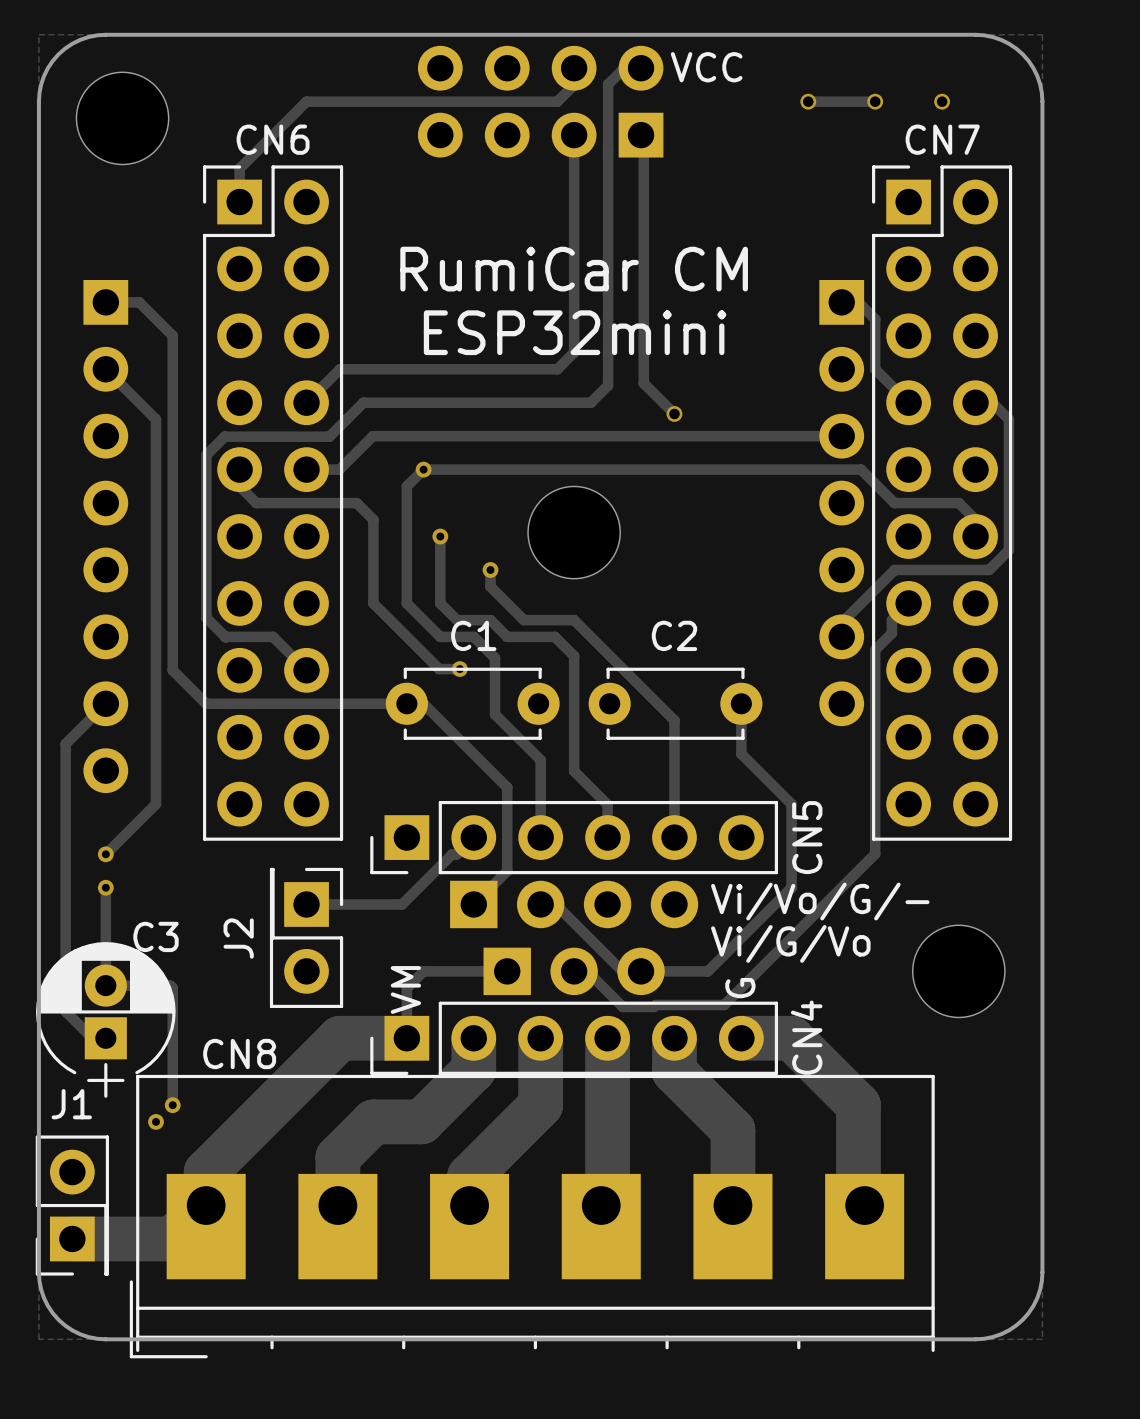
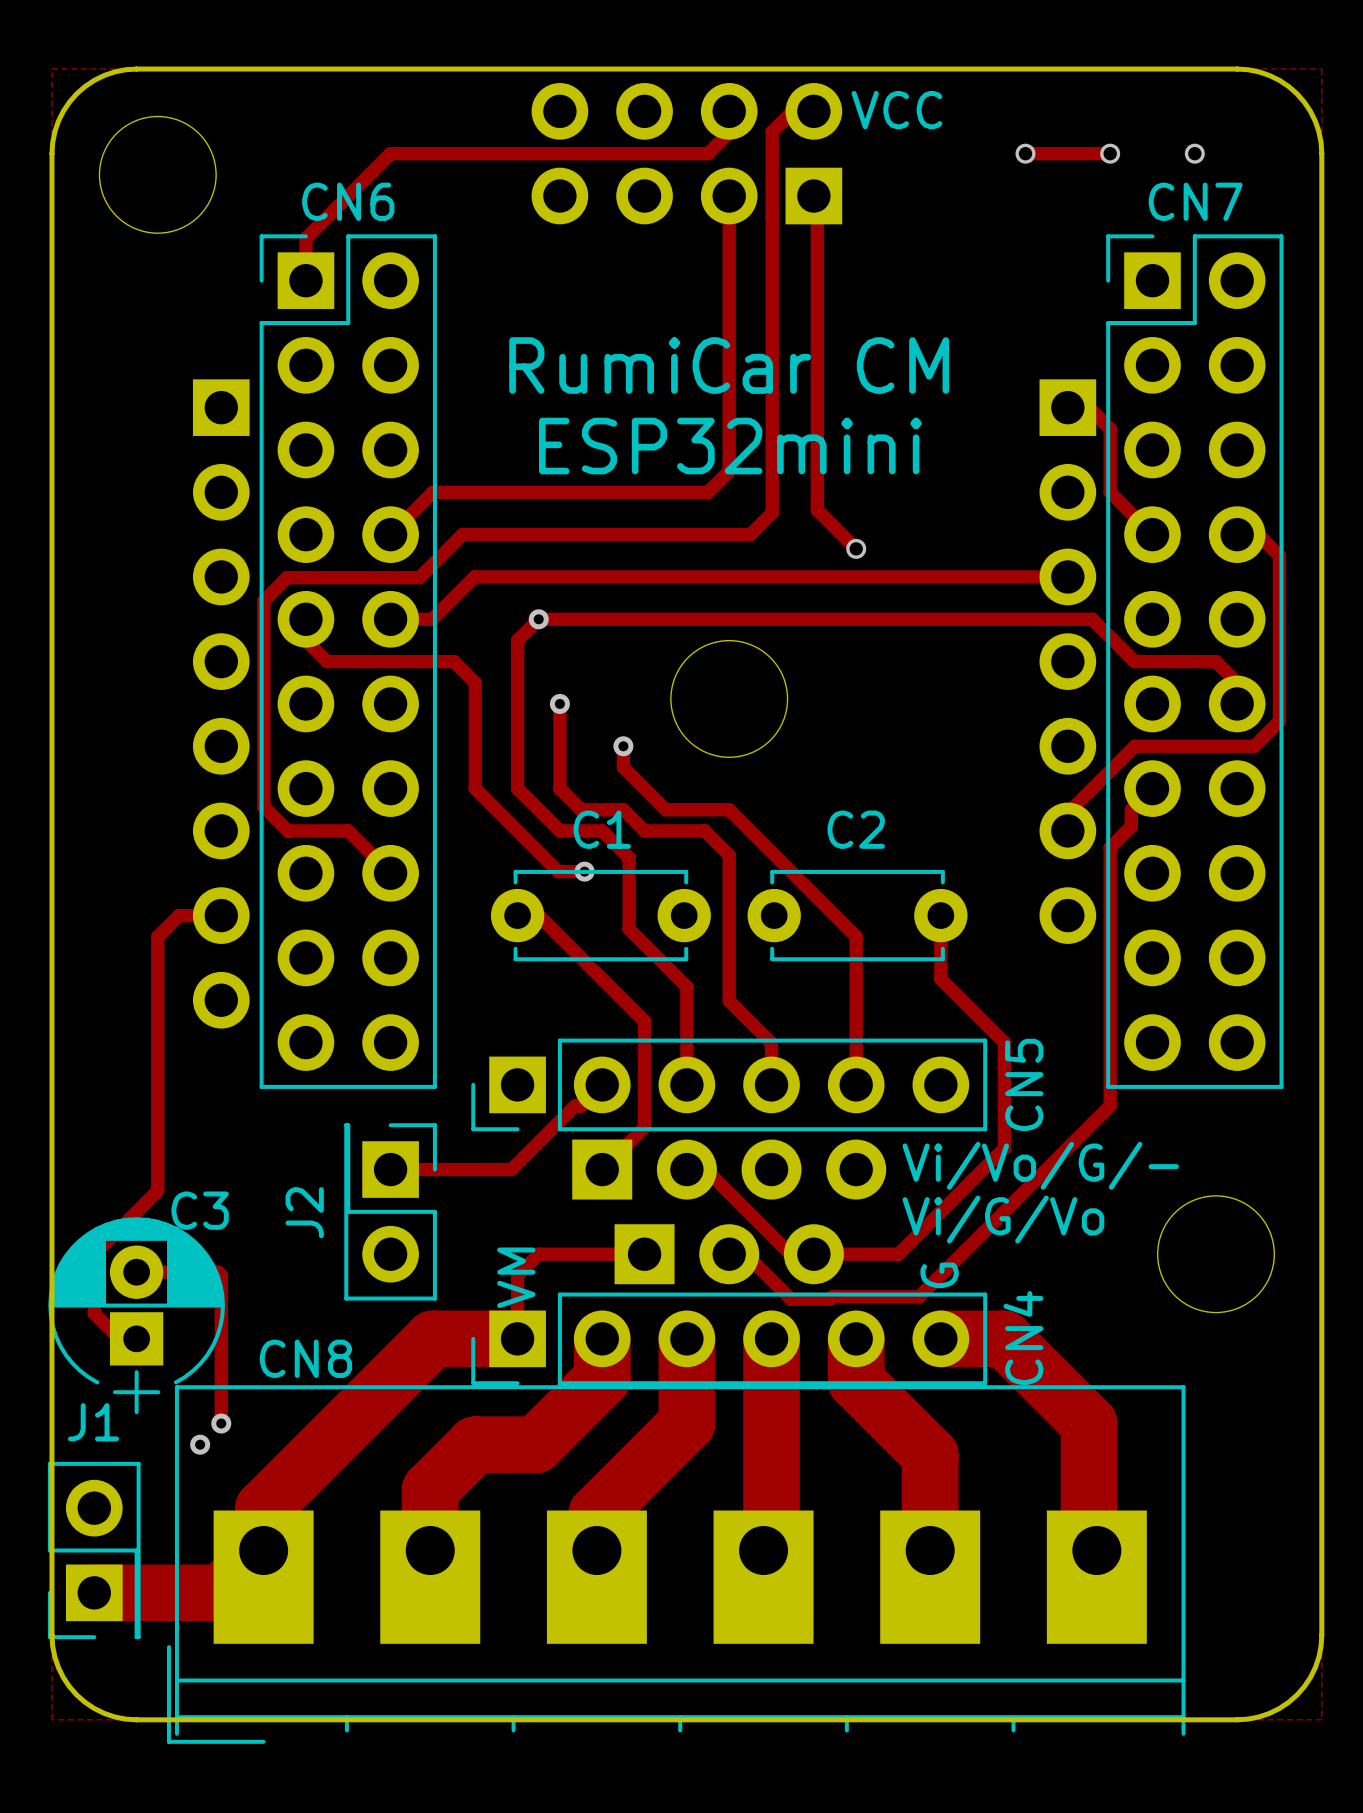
track: (105, 302) (139, 302) (172, 335) (172, 670) (206, 703) (406, 703) -> none
track: (105, 369) (156, 419) (156, 804) (105, 854) -> none
part position: (105, 536) -> (221, 703)
track: (105, 703) (65, 743) (65, 1011) (72, 1018) -> (221, 915) (178, 915) (157, 936) (157, 1190) (94, 1254) (94, 1313)
via: (105, 854) -> none
track: (105, 887) (105, 985) -> none
via: (105, 887) -> none

